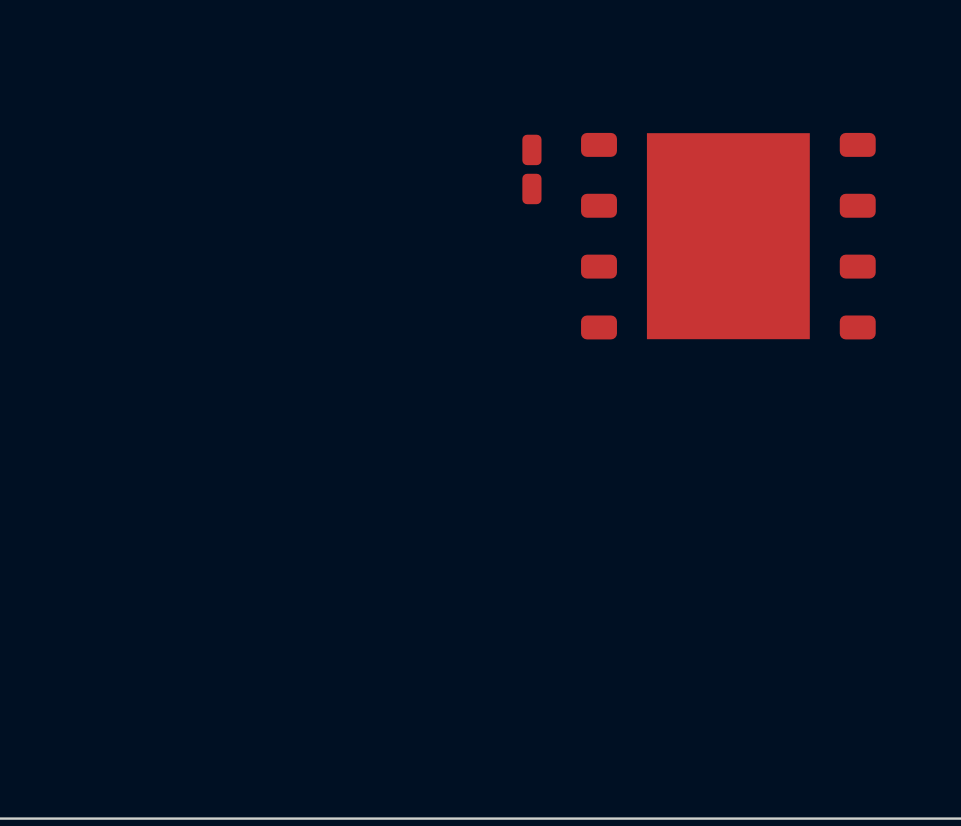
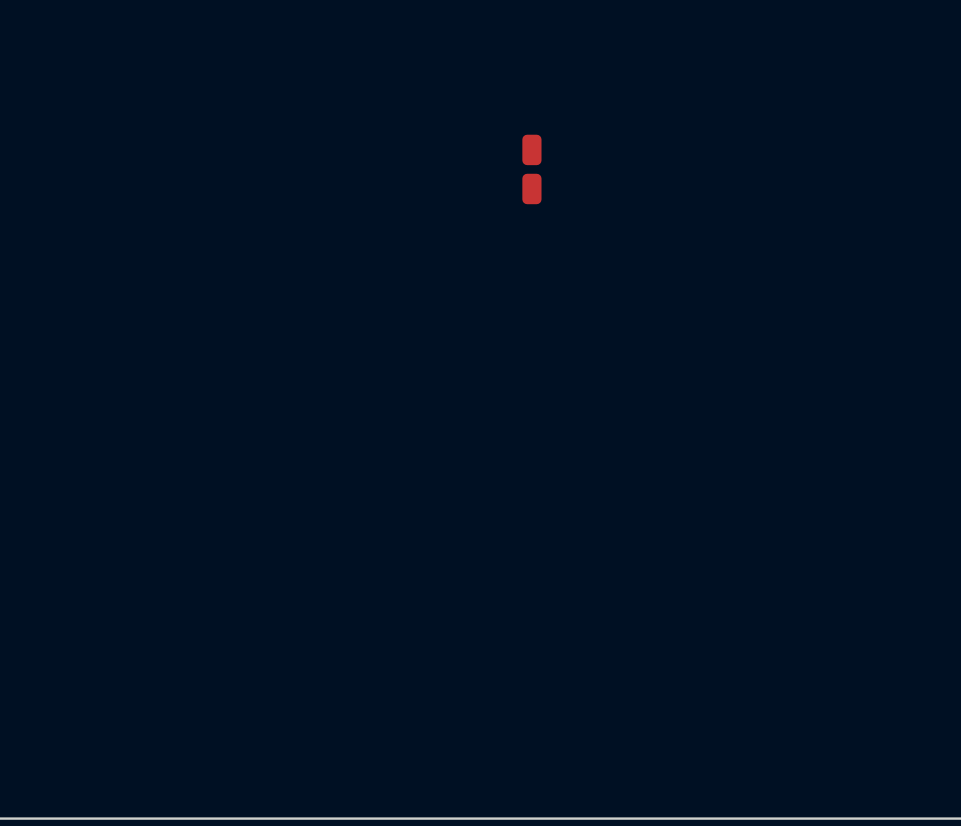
part: (728, 236) -> none

